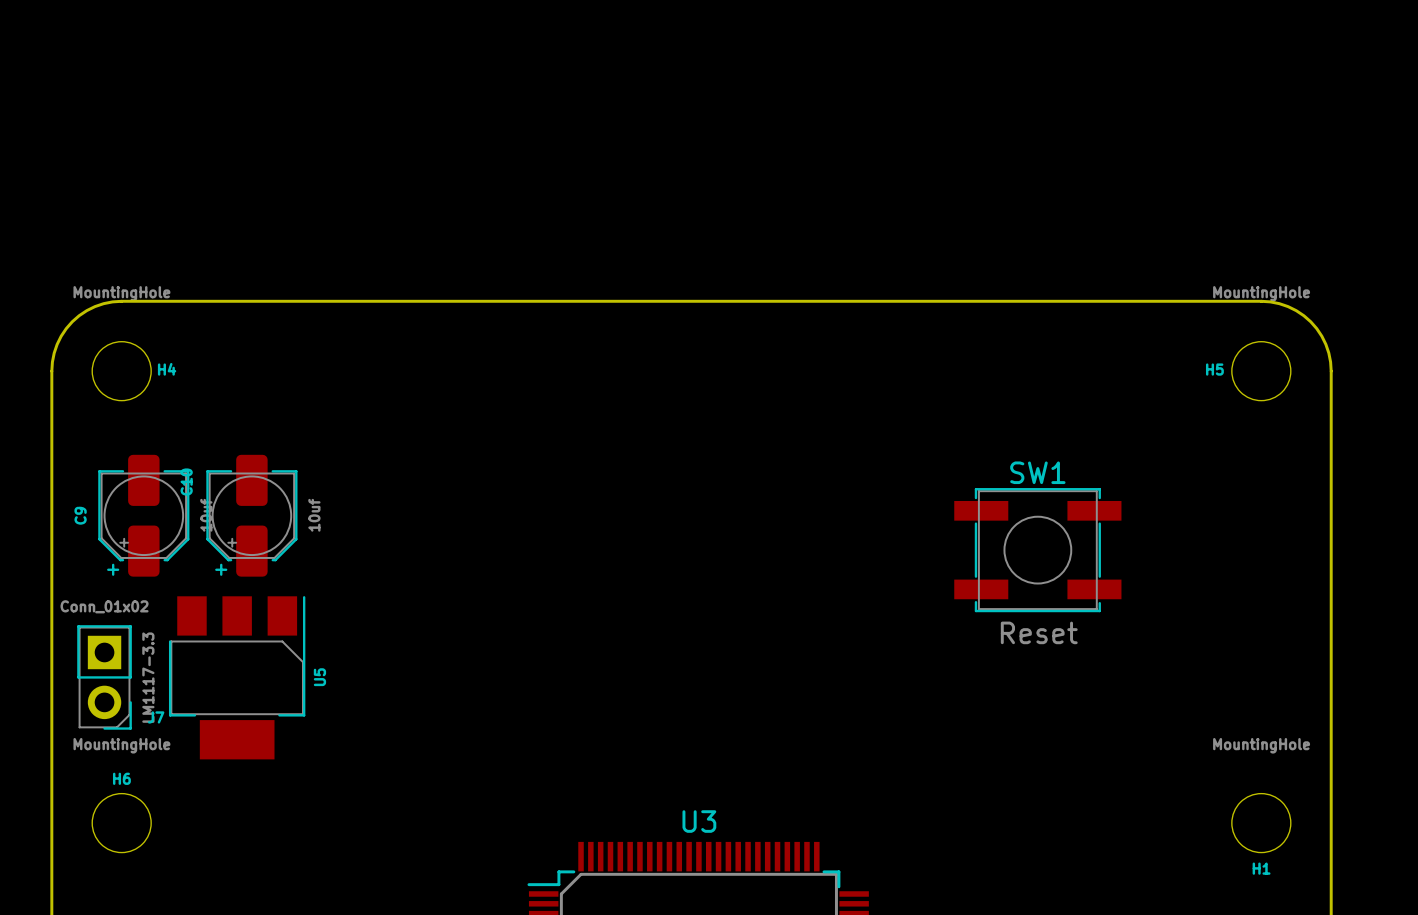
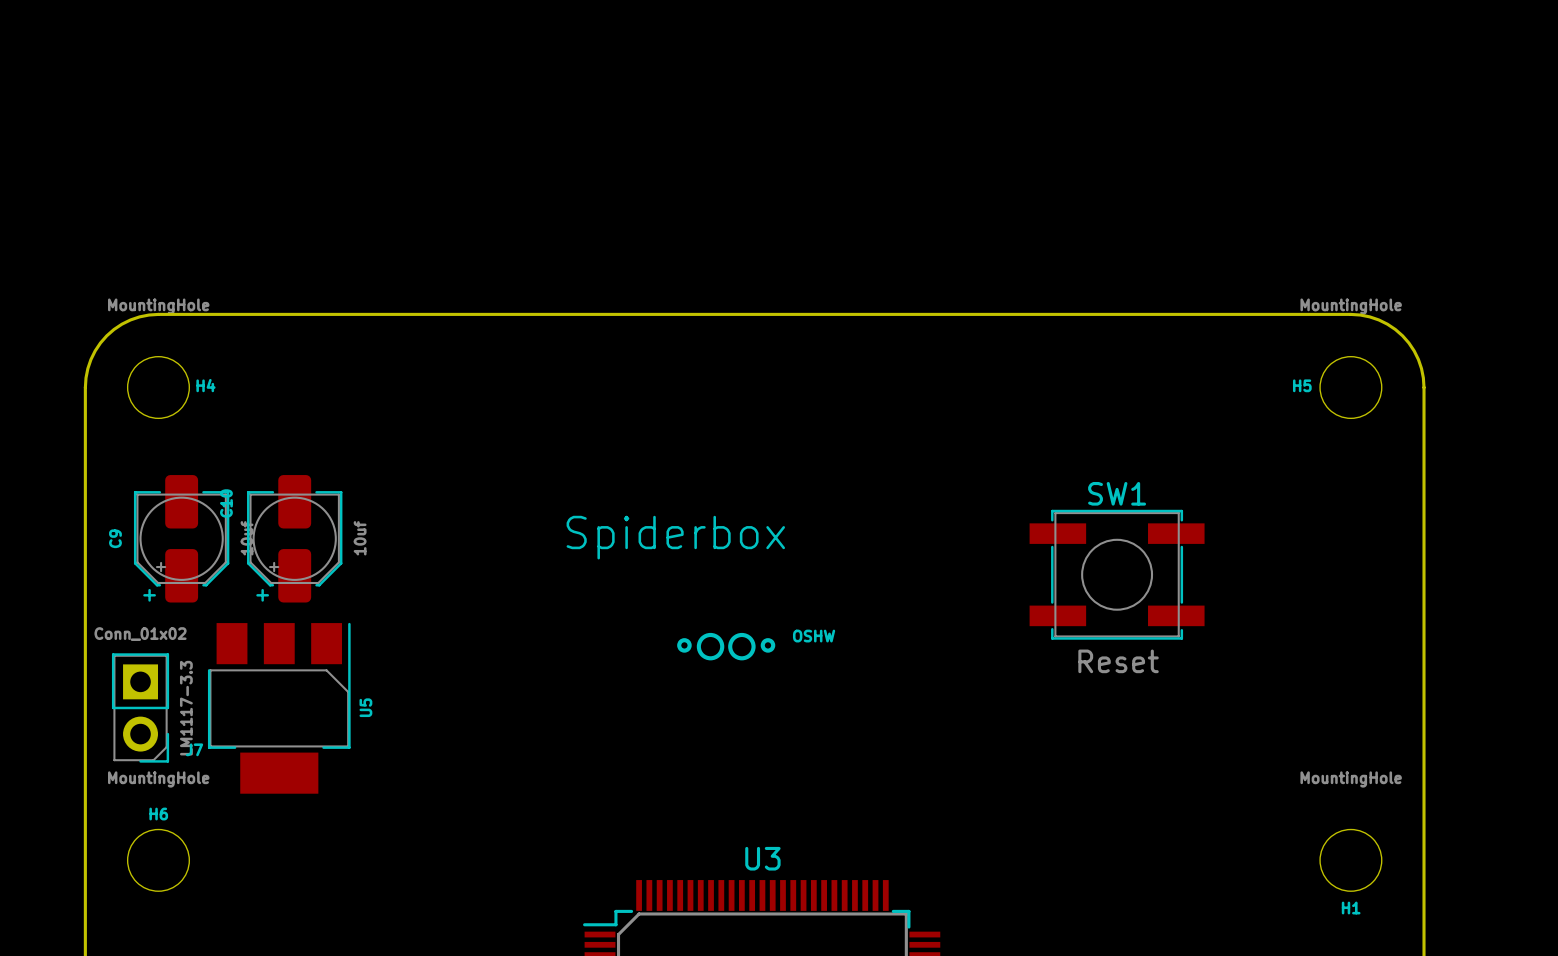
text: none -> Spiderbox (675, 537)
drawing: none -> [677, 632, 776, 661]
text: none -> OSHW (814, 636)

